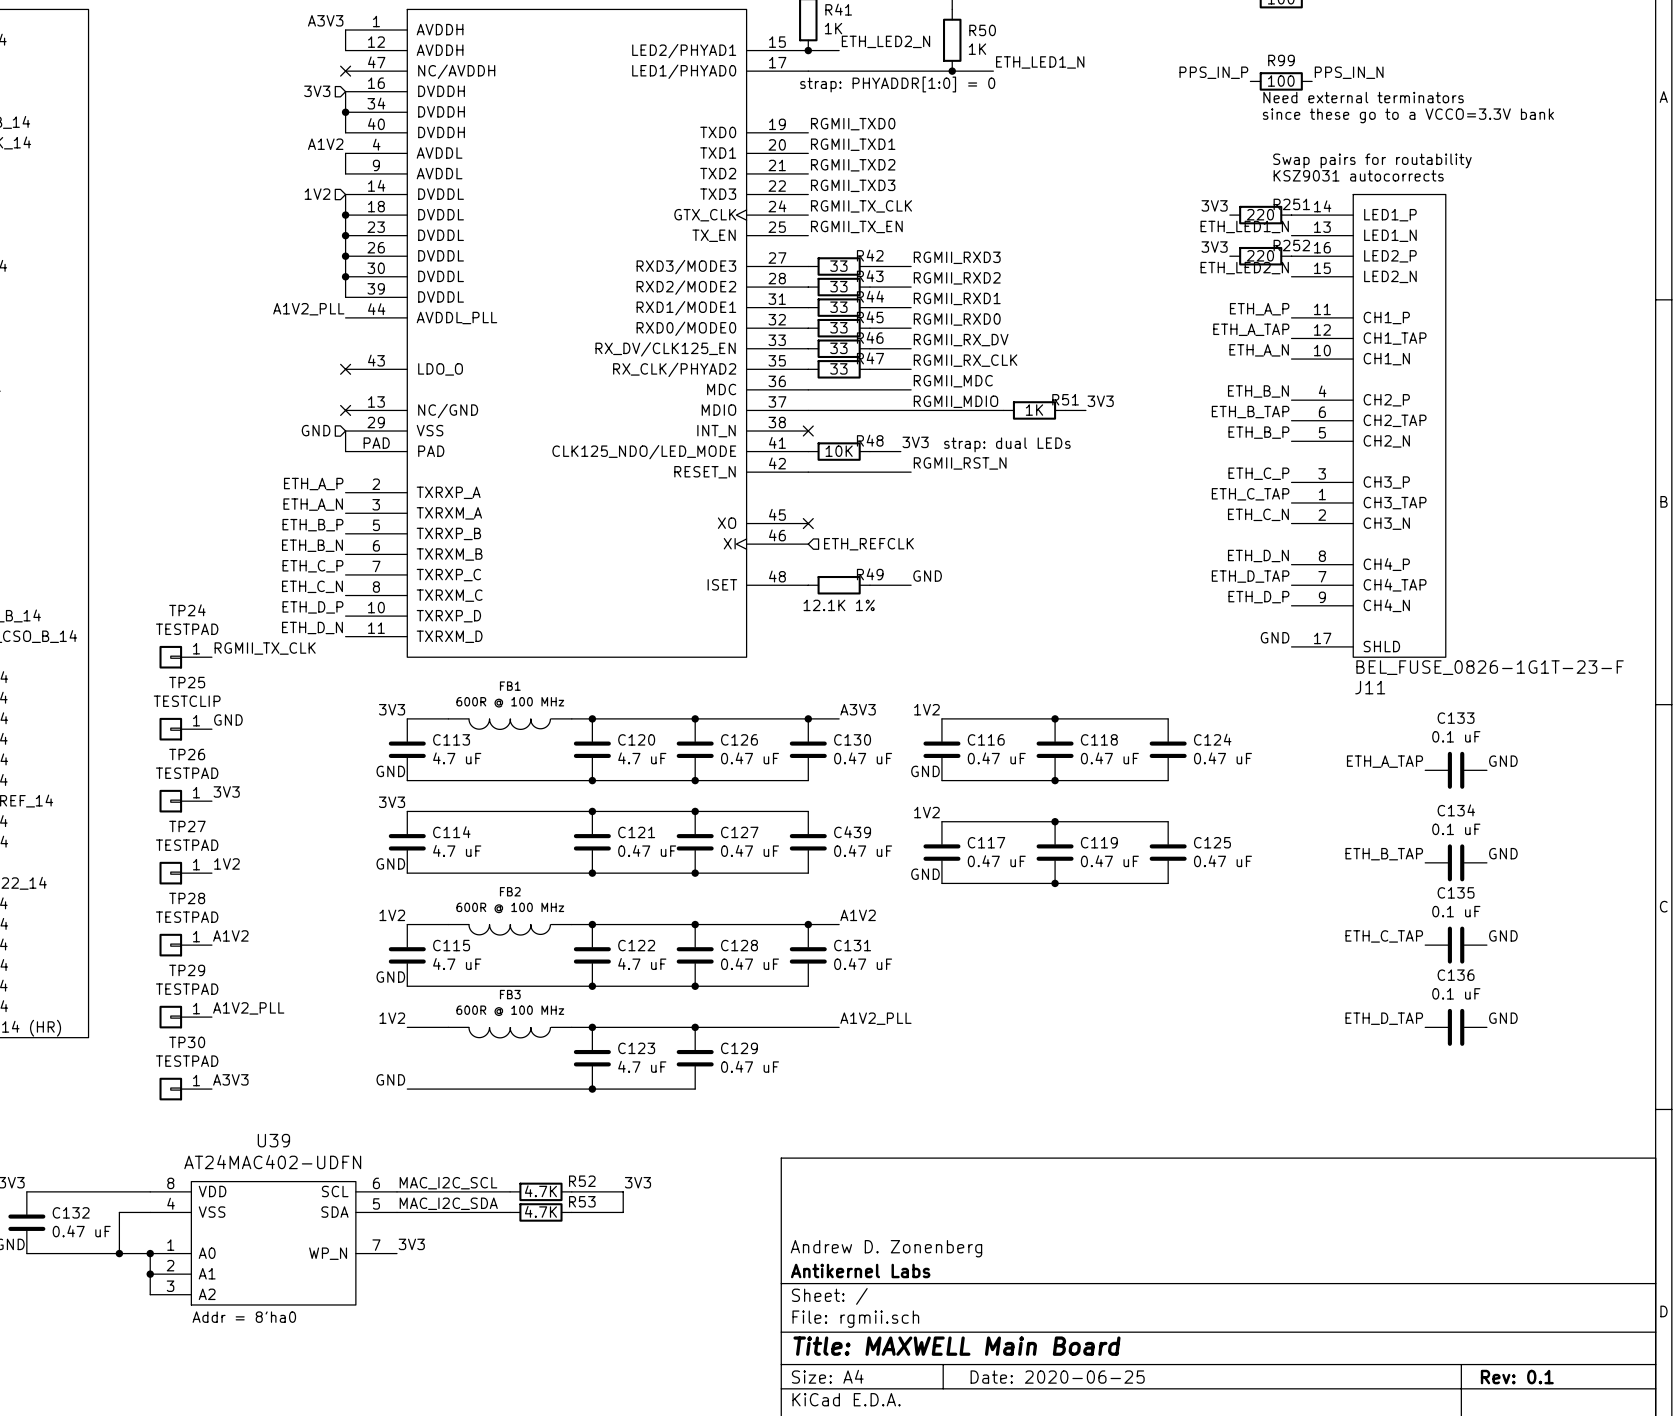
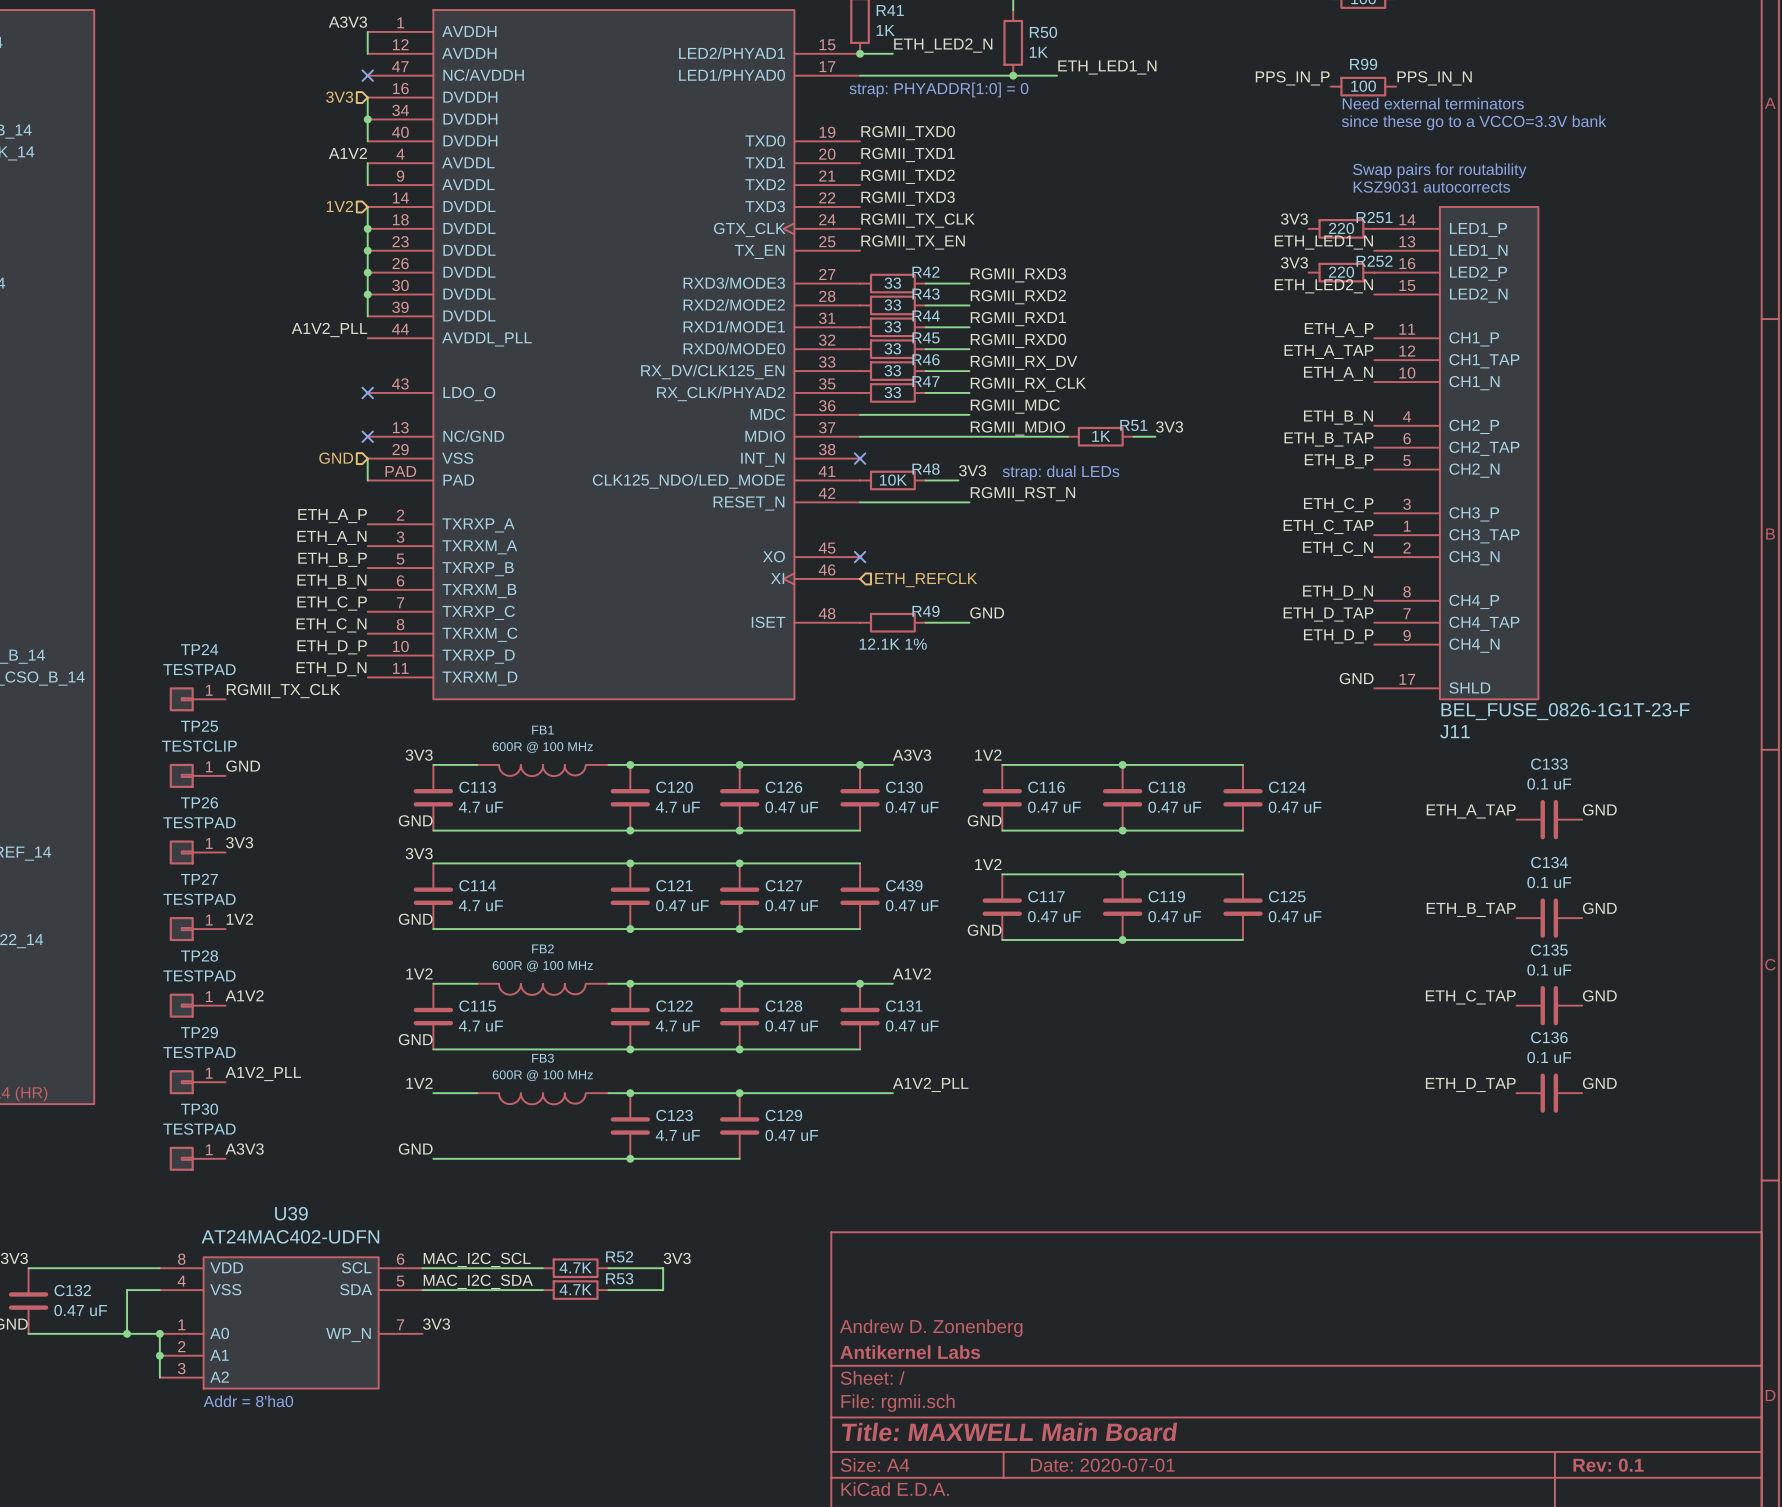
title block: Date: 2020-06-25 (1057, 1377) -> Date: 2020-07-01 (1102, 1465)

